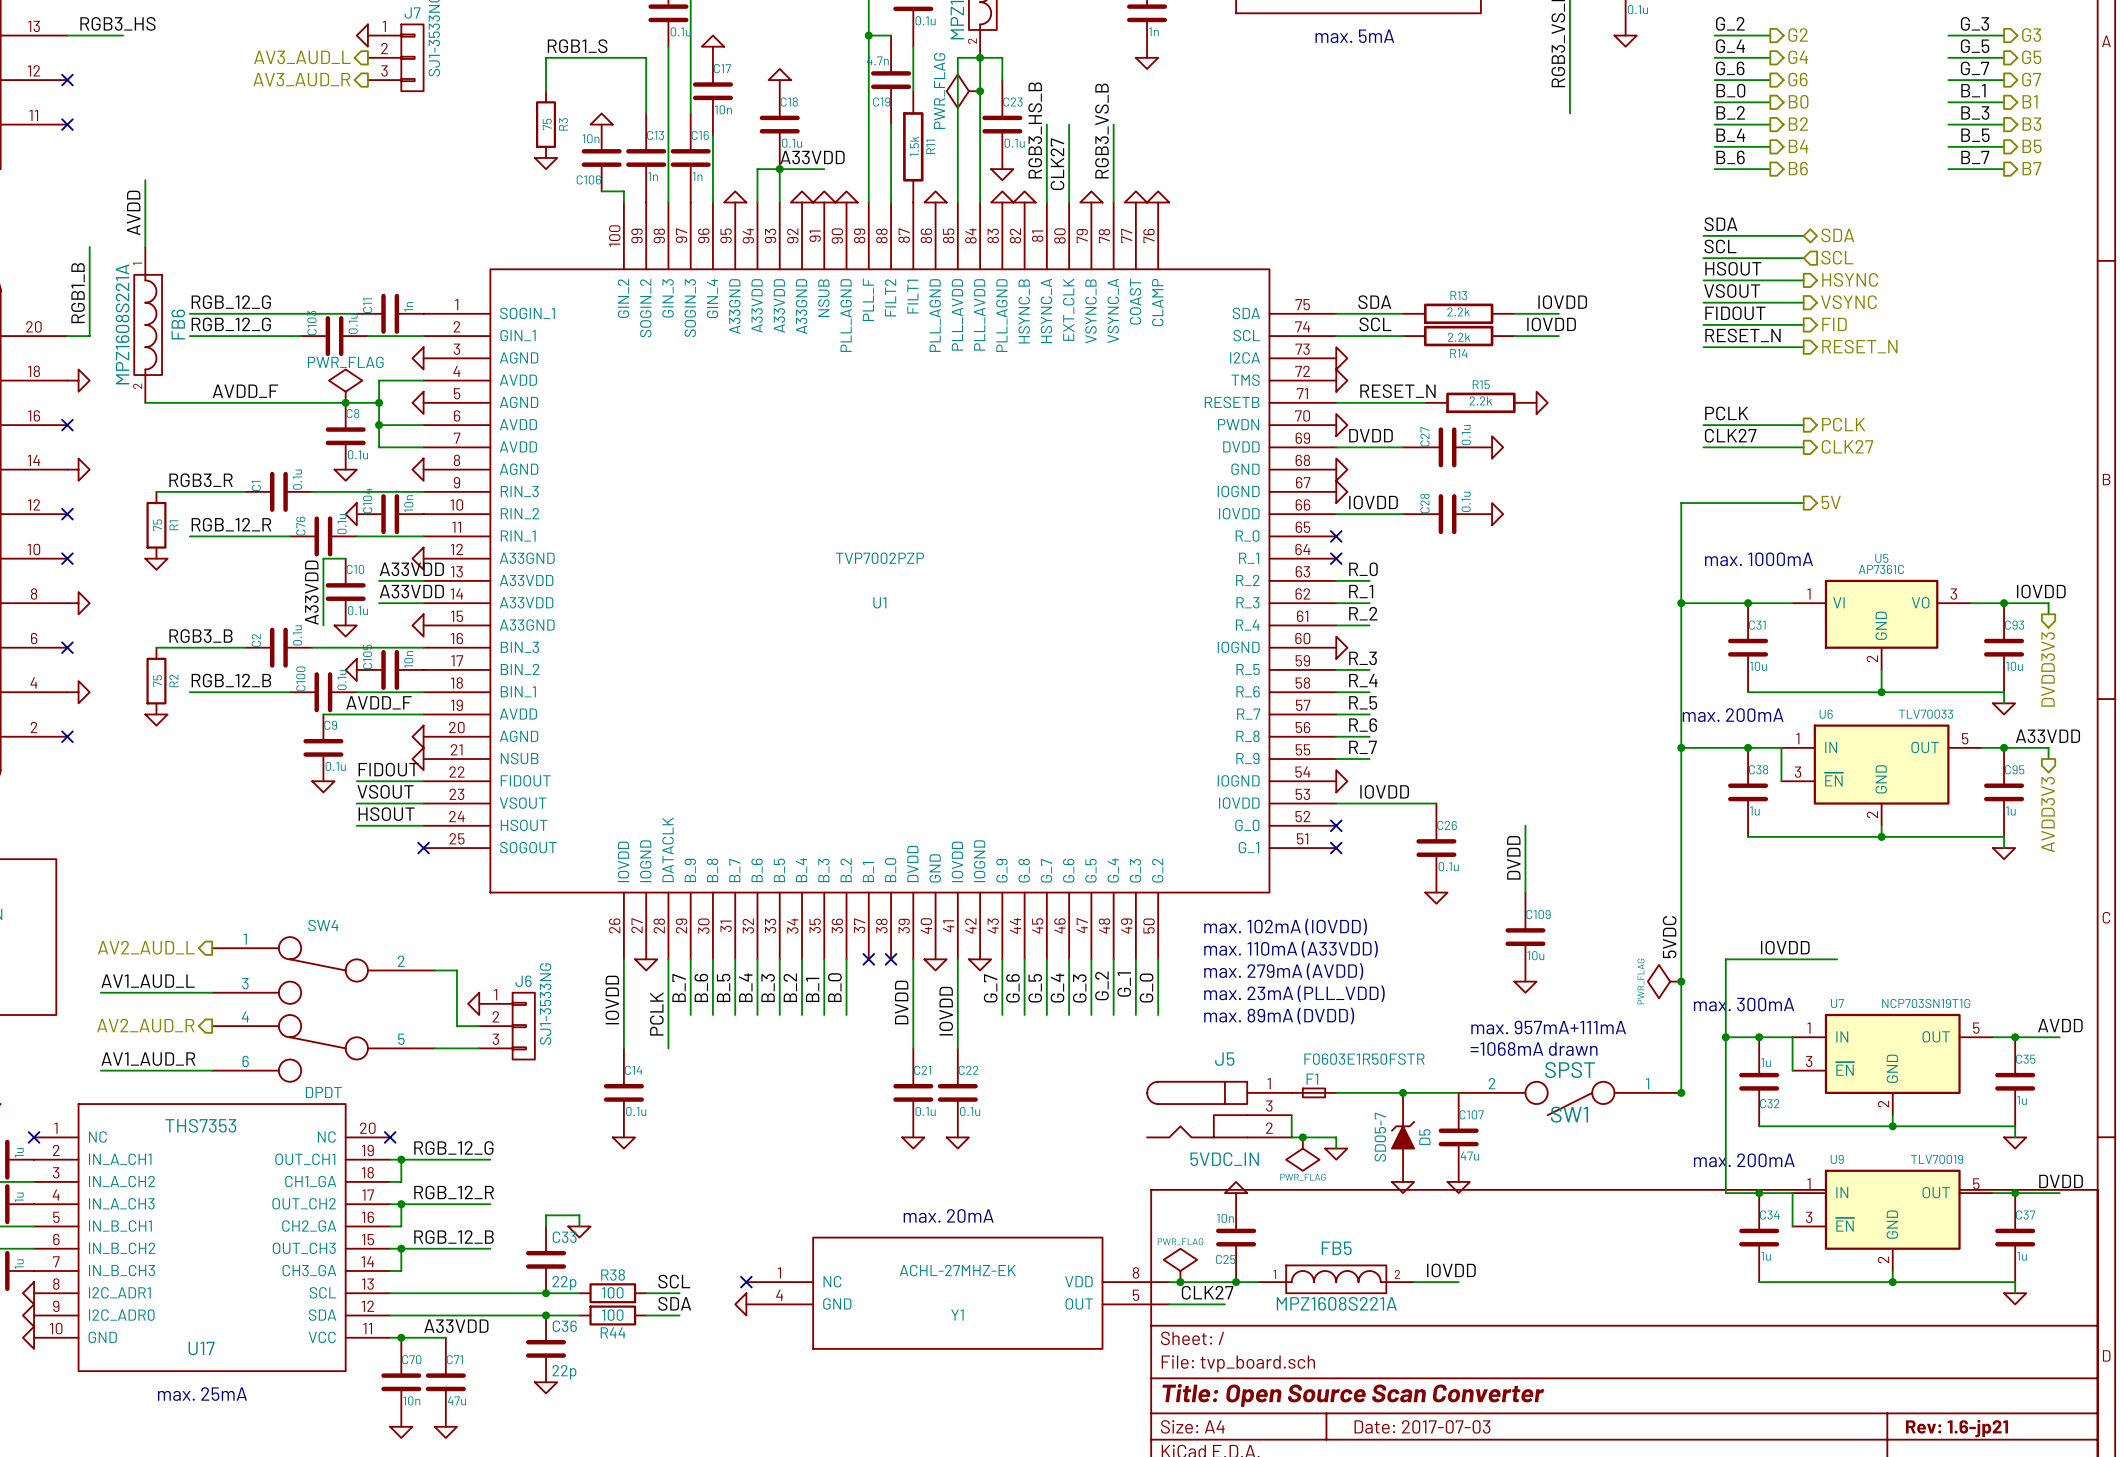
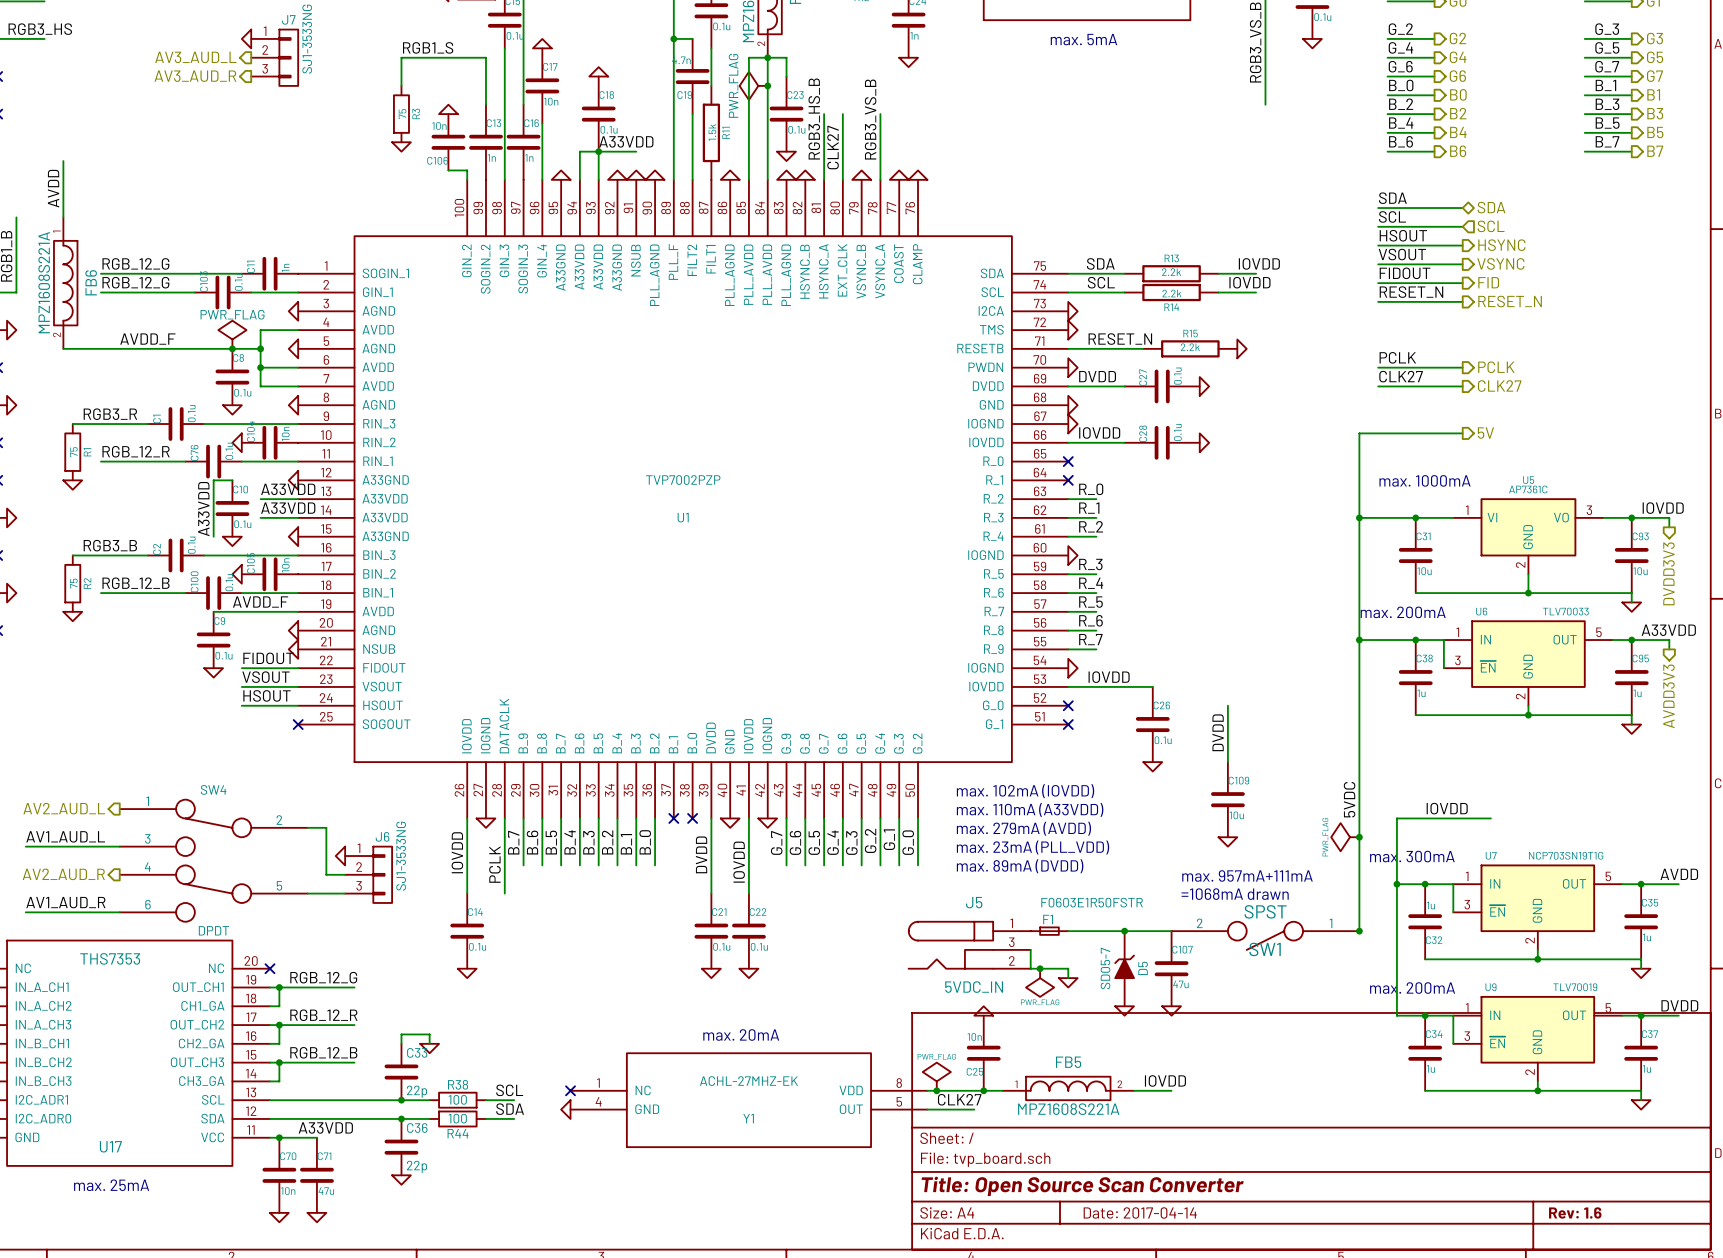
title block: Date: 2017-07-03 (1422, 1426) -> Date: 2017-04-14 (1140, 1212)
title block: Rev: 1.6-jp21 (1957, 1428) -> Rev: 1.6 (1575, 1212)

